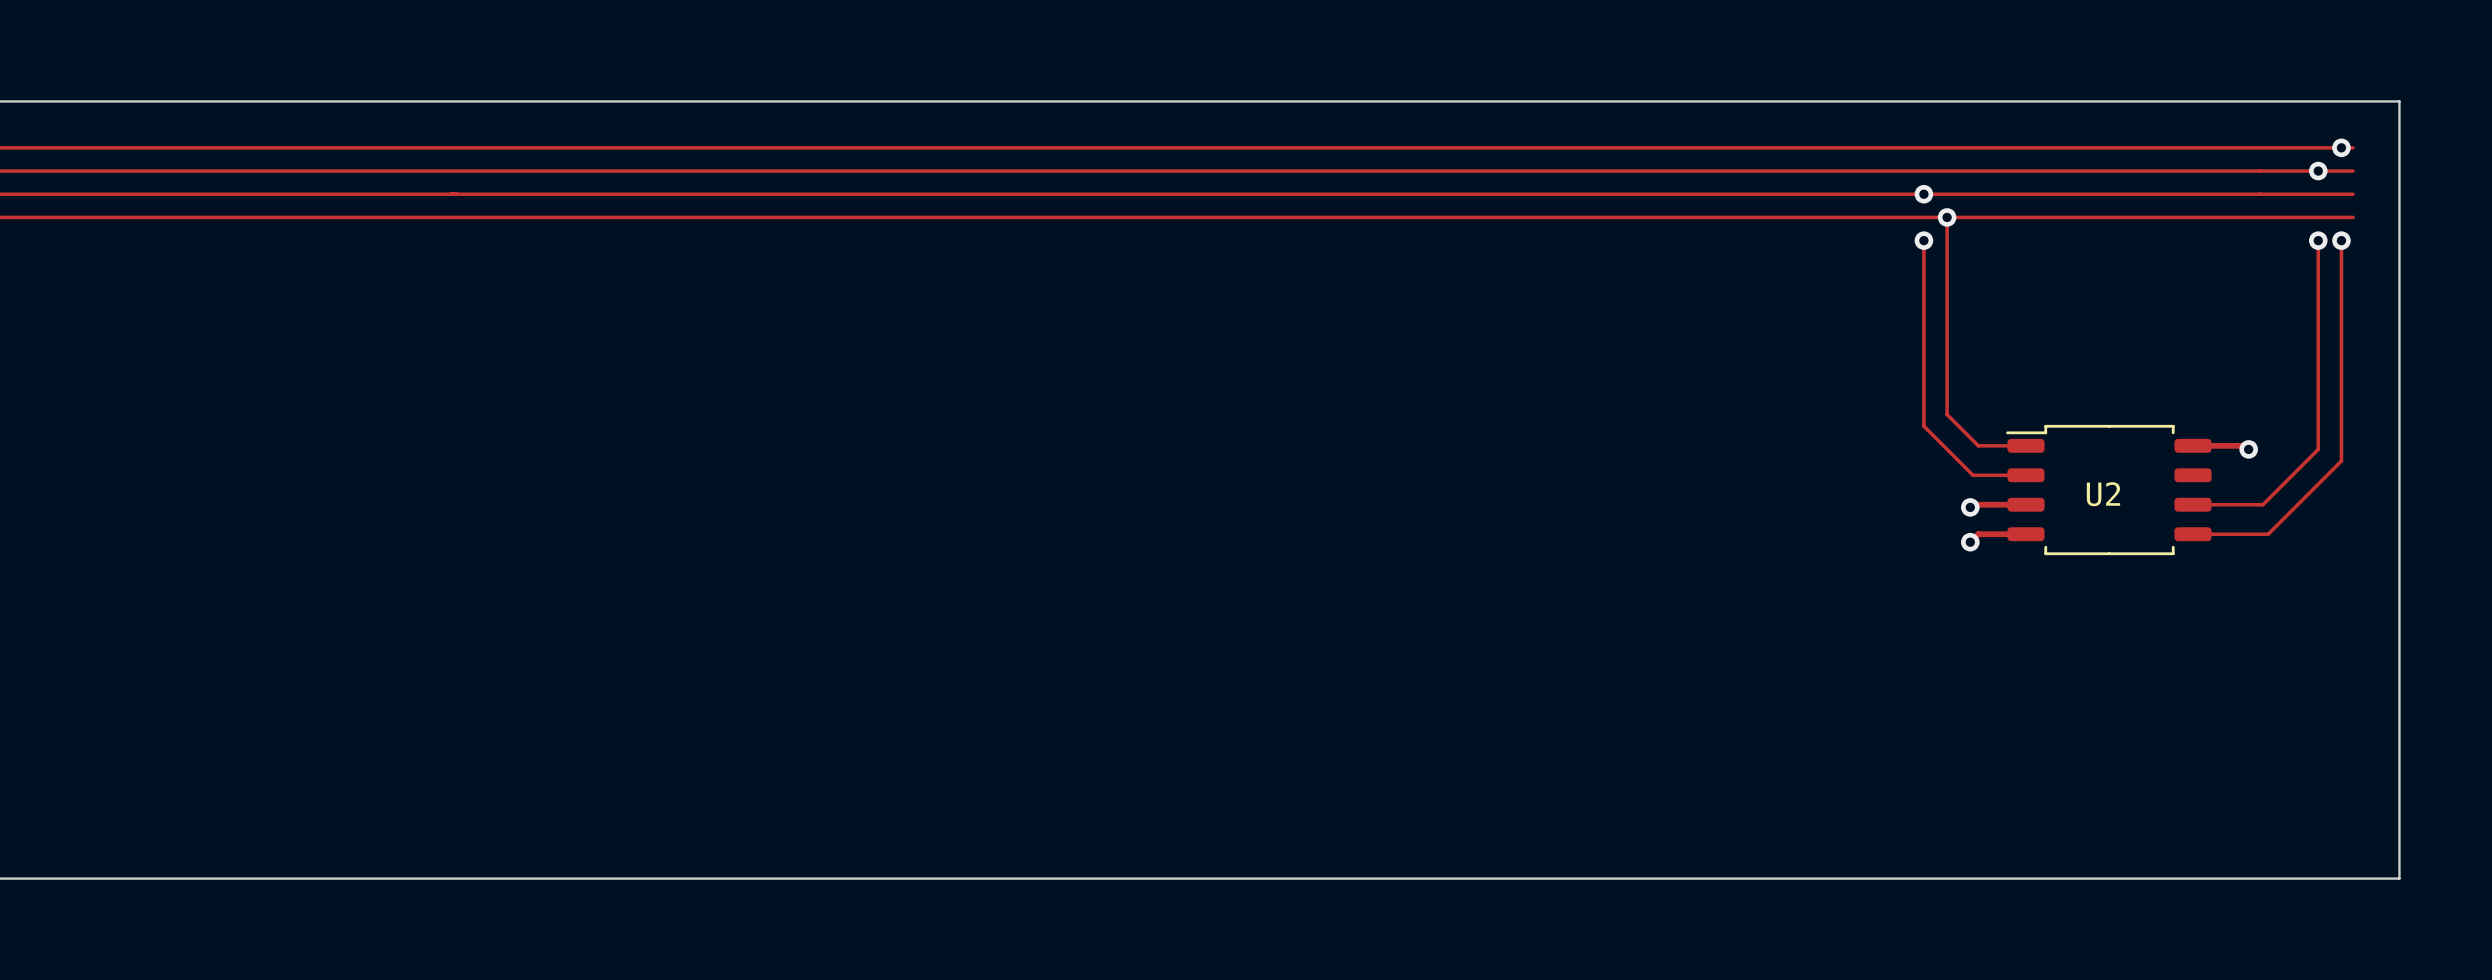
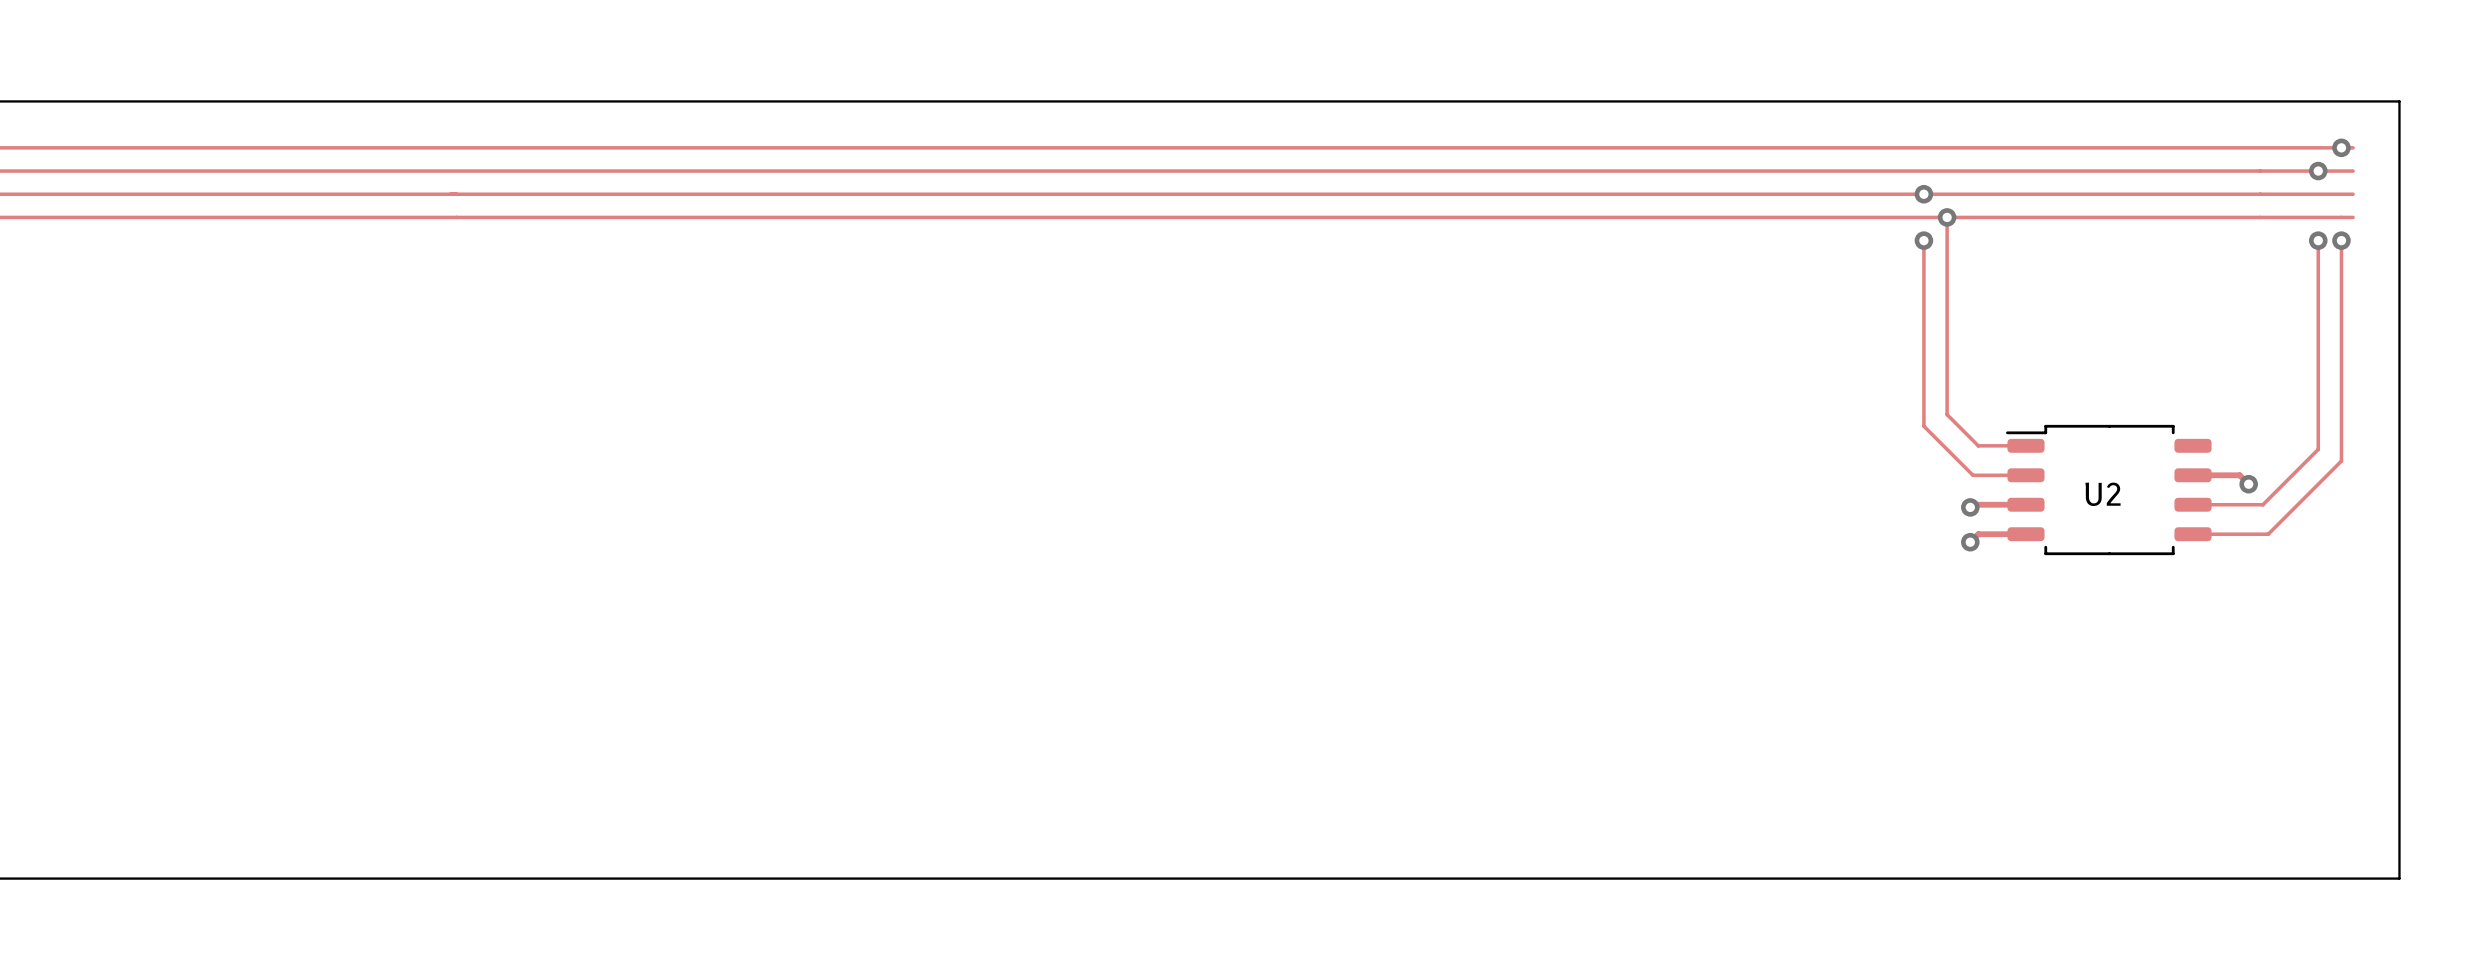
track: (2193, 445) (2245, 445) (2248, 449) -> none
via position: (2248, 449) -> (2248, 484)
track: none -> (2193, 475) (2239, 475) (2248, 484)

